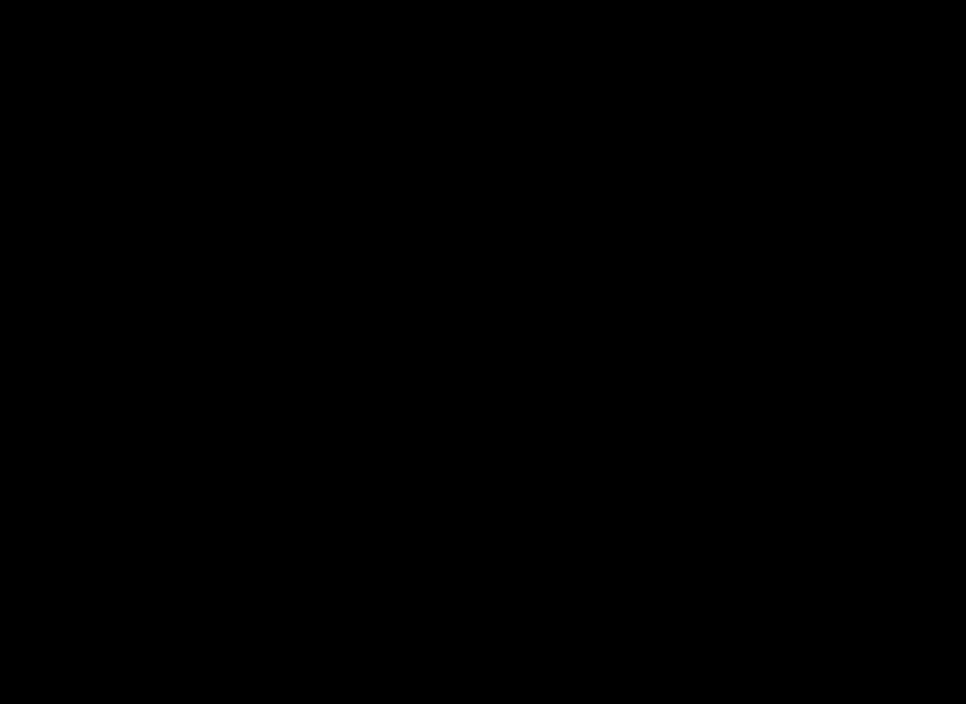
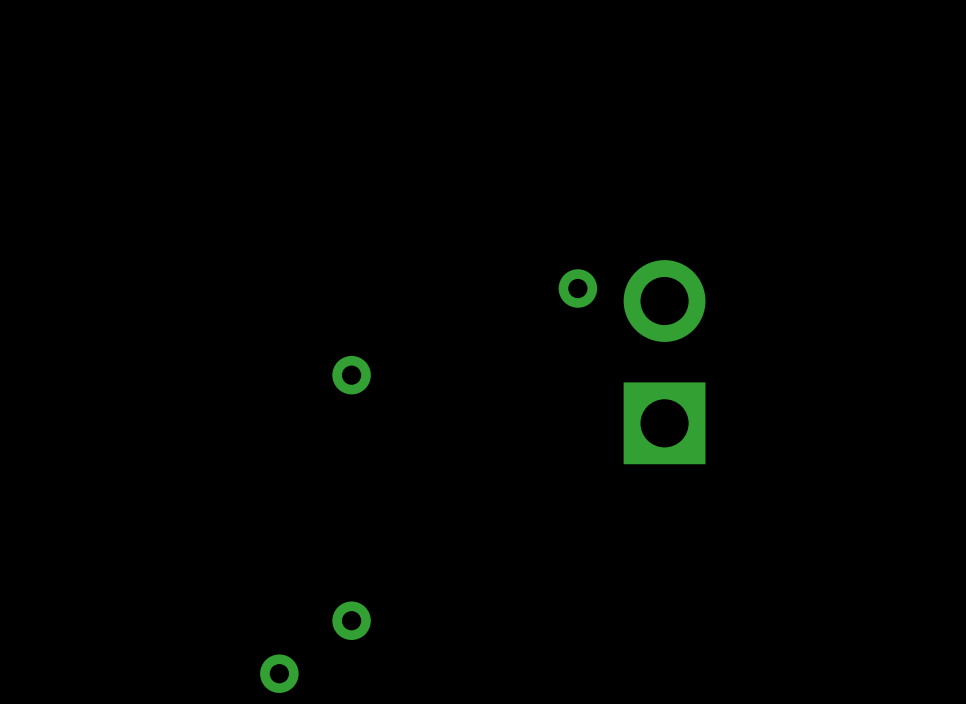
via: none -> (577, 288)
part: none -> (664, 362)
via: none -> (351, 375)
via: none -> (351, 620)
via: none -> (279, 673)

